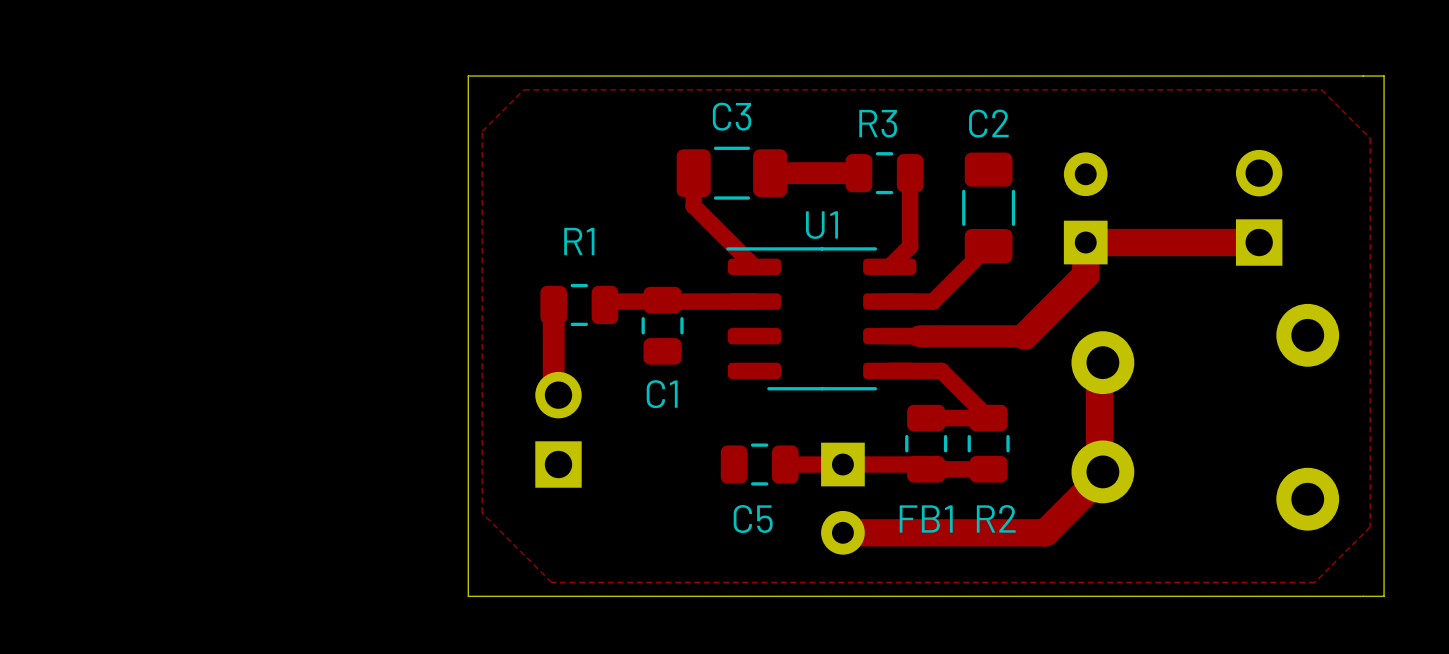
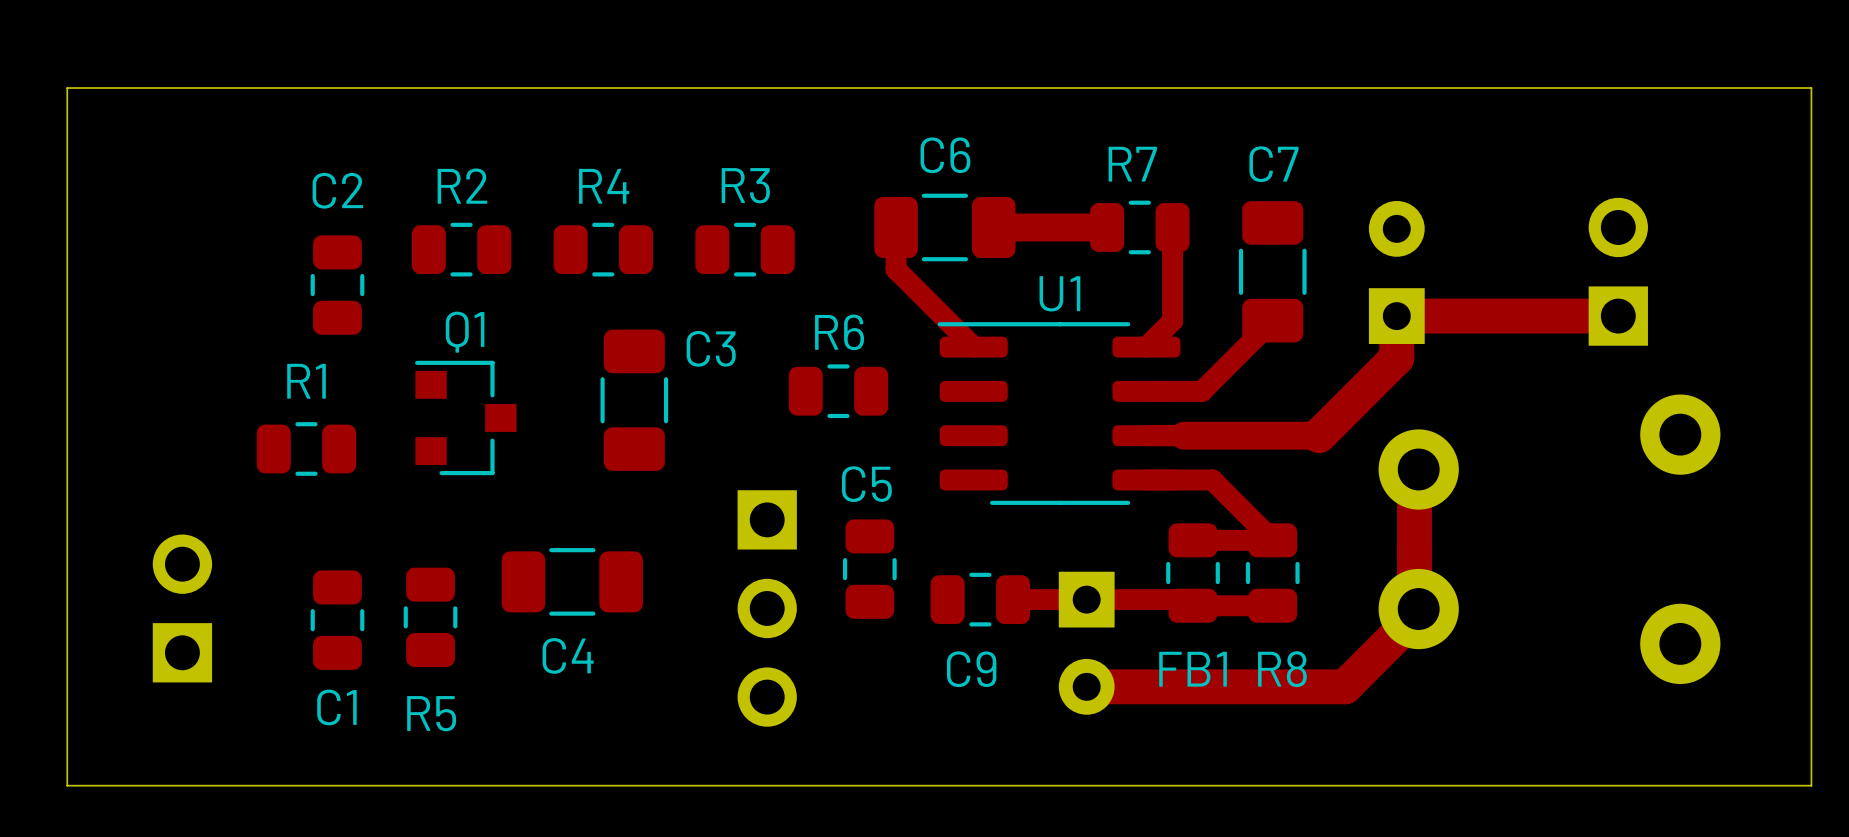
board edge: (468, 76) (1384, 76) (1384, 596) (468, 596) (468, 76) -> (67, 88) (67, 785) (1811, 785) (1811, 88) (67, 88)
zone outline: (523, 89) (482, 131) (482, 513) (551, 582) (1314, 582) (1370, 526) (1370, 138) (1321, 89) (523, 89) -> none
C3 name: C3 (732, 116) -> C6 (945, 155)
R3 name: R3 (878, 123) -> R7 (1132, 164)
C2 name: C2 (988, 123) -> C7 (1274, 164)
R2: none -> (461, 249)
R4: none -> (603, 249)
R3: none -> (745, 249)
C2: none -> (337, 285)
R1 name position: R1 (579, 241) -> R1 (306, 381)
R6: none -> (838, 391)
track: (754, 301) (608, 301) (604, 304) -> none
track: (553, 304) (553, 390) (558, 395) -> none
R1 position: (579, 304) -> (306, 448)
C3: none -> (634, 400)
Q1: none -> (465, 417)
C1 position: (662, 325) -> (337, 620)
part position: (558, 429) -> (182, 608)
C5: none -> (869, 569)
C4: none -> (572, 581)
part: none -> (767, 608)
R5: none -> (430, 617)
R2 name: R2 (996, 518) -> R8 (1282, 669)
C5 name: C5 (753, 519) -> C9 (971, 669)

